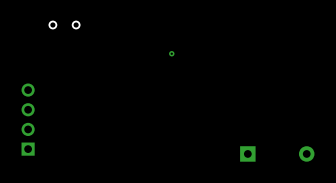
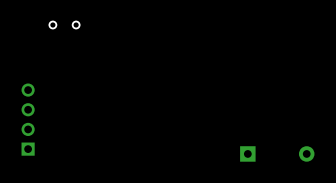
via: (171, 53) -> none

